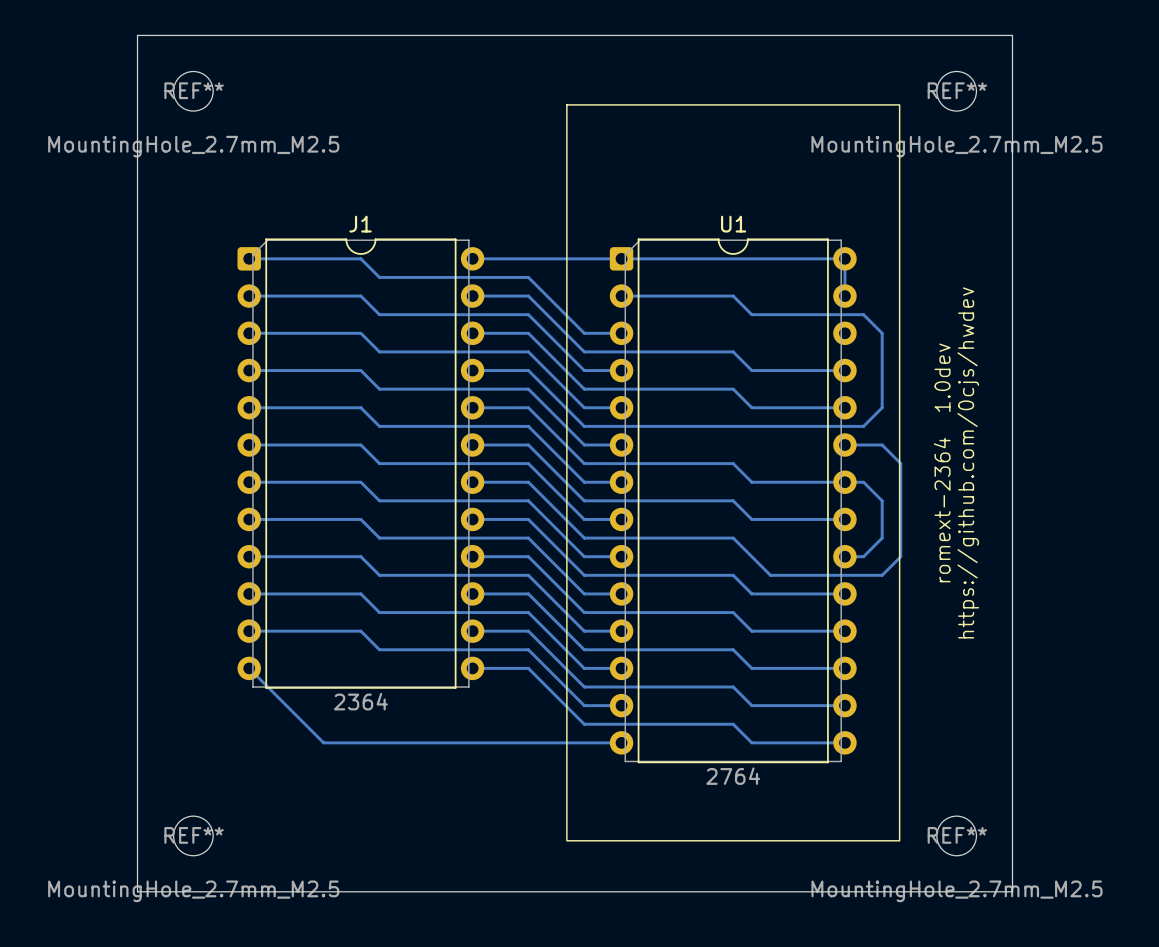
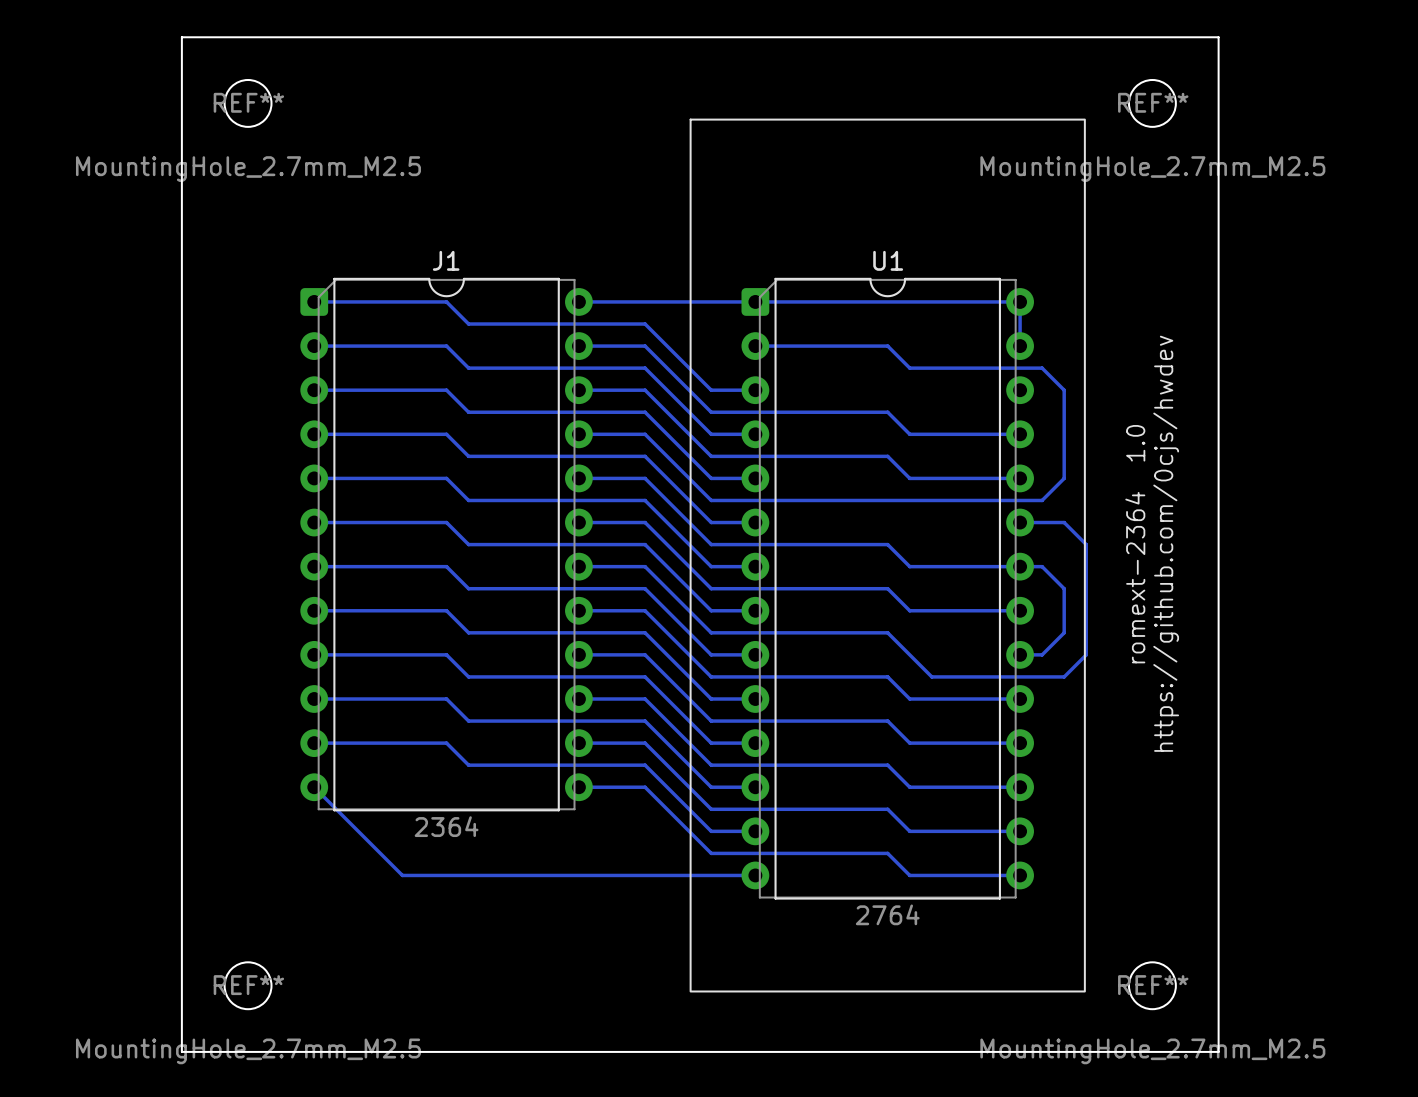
text: romext-2364 1.0dev (942, 462) -> romext-2364 1.0 (1135, 544)

